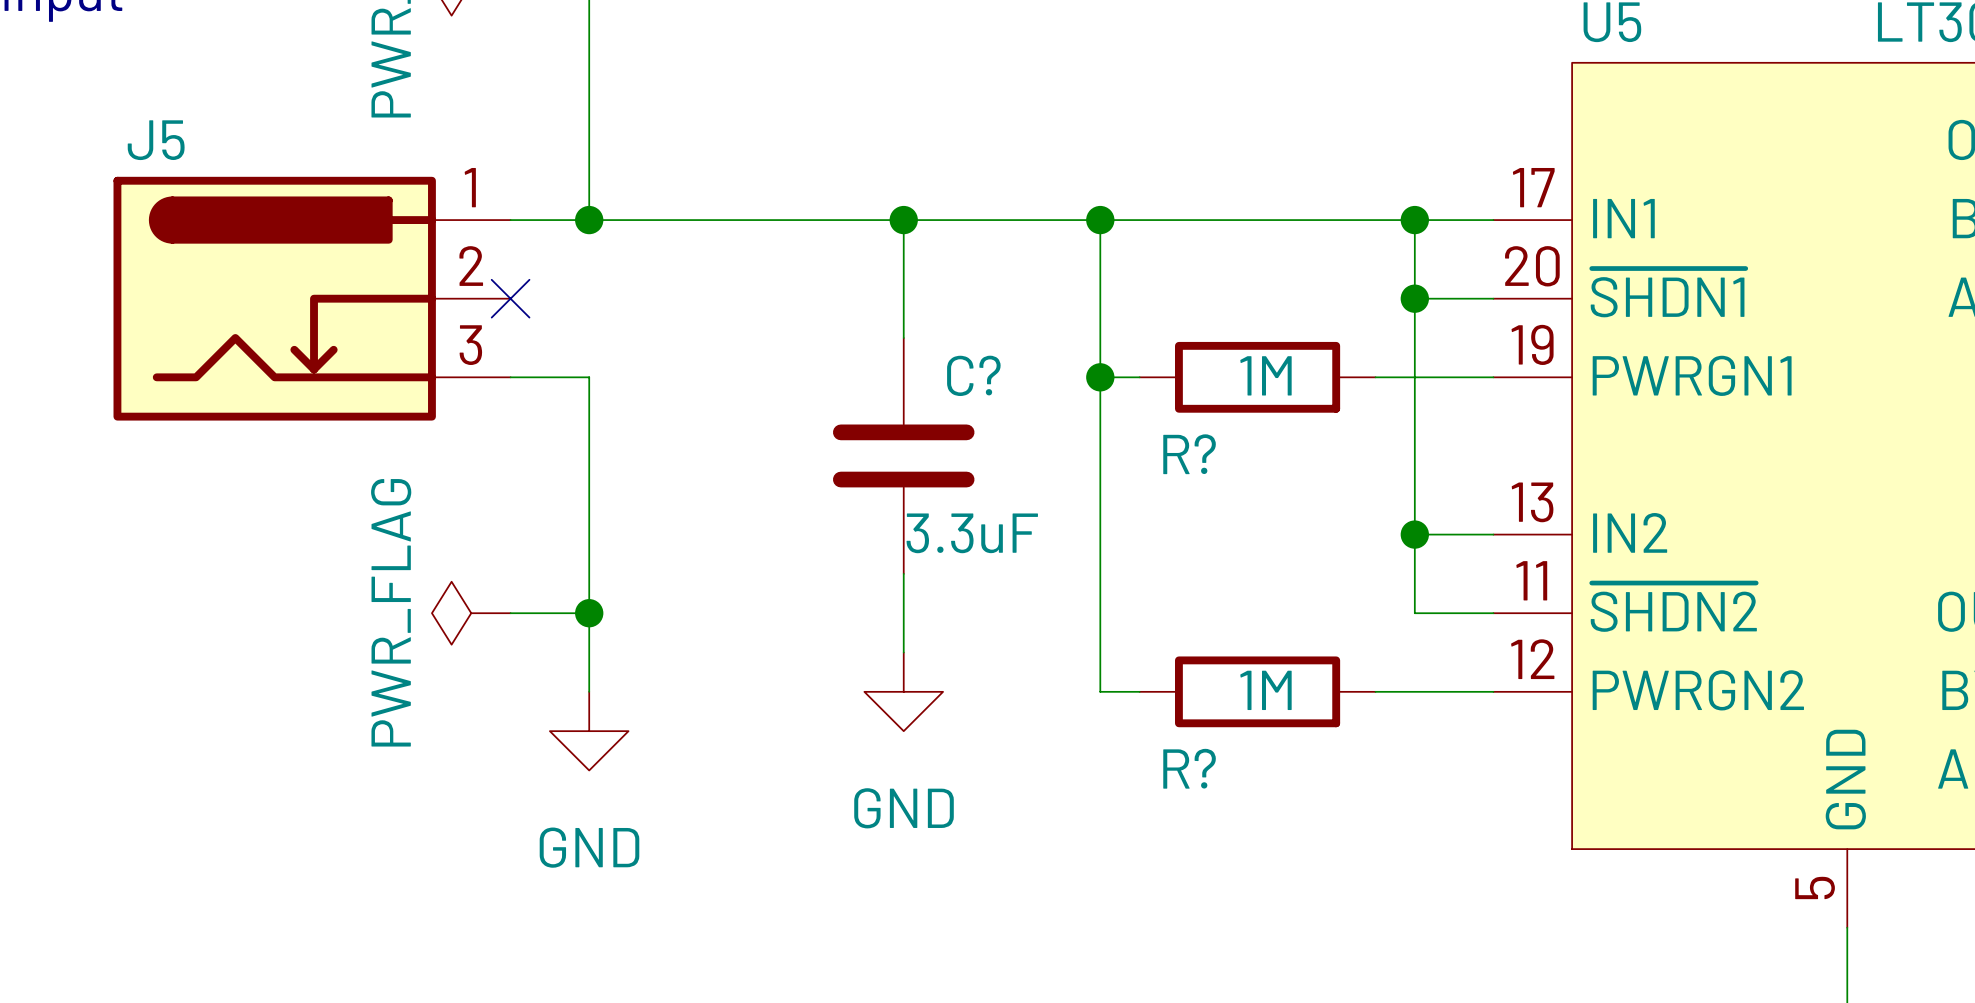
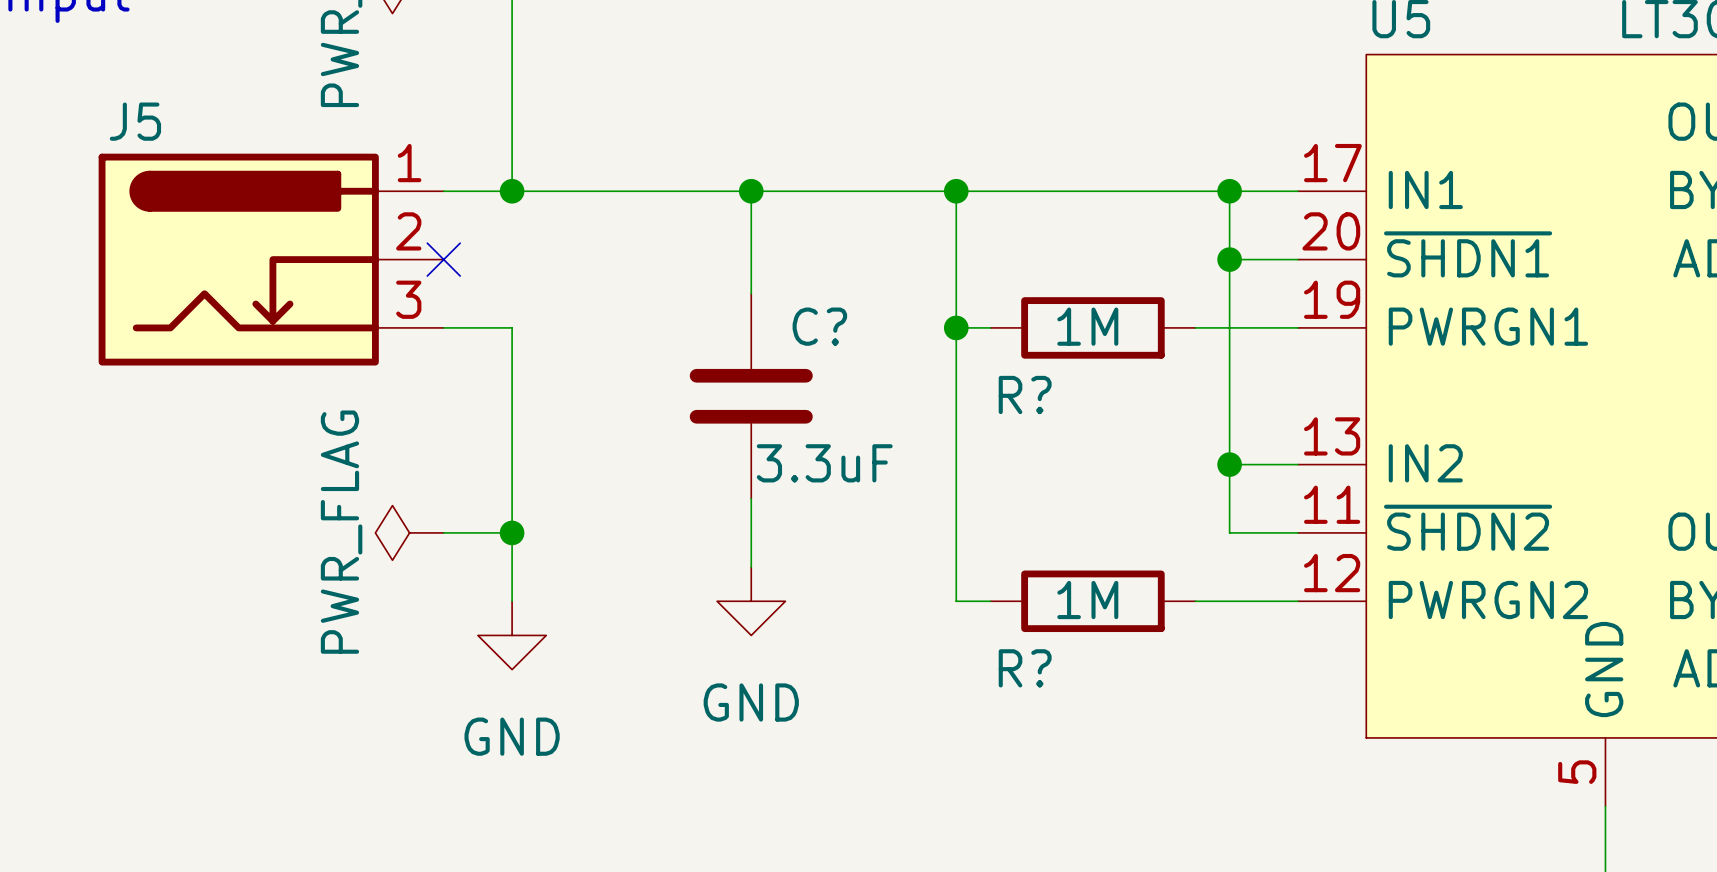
wire: (903, 220) (903, 338) -> (751, 191) (751, 293)
junction position: (903, 220) -> (751, 191)
C? position: (903, 455) -> (751, 396)
wire: (903, 573) (903, 652) -> (751, 498) (751, 567)
power symbol position: GND (903, 691) -> GND (751, 601)

